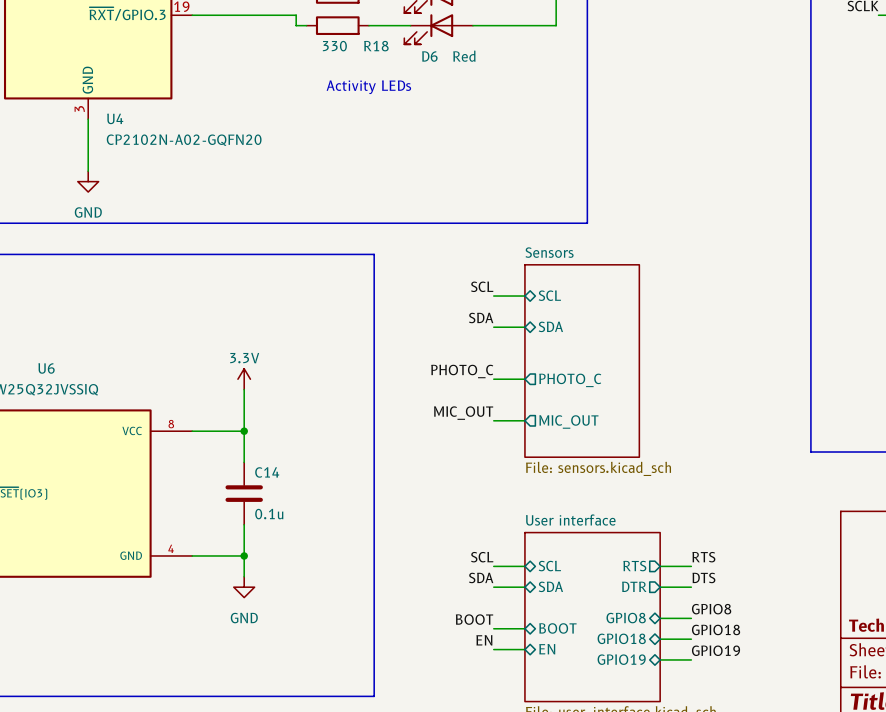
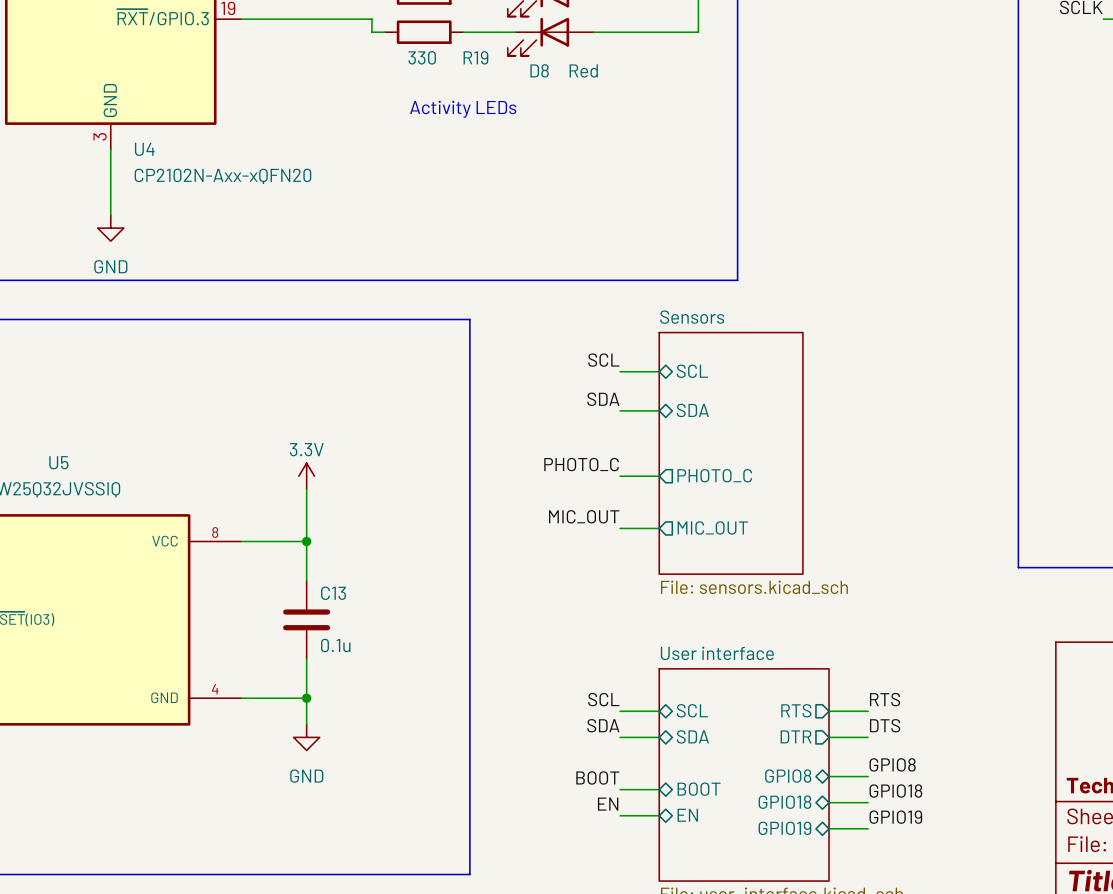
R18 name: R18 (376, 46) -> R19 (475, 57)
D6 name: D6 (429, 56) -> D8 (539, 70)
U4 value: CP2102N-A02-GQFN20 (184, 140) -> CP2102N-Axx-xQFN20 (222, 176)
U6 name: U6 (46, 368) -> U5 (58, 462)
C14 name: C14 (267, 472) -> C13 (333, 593)

